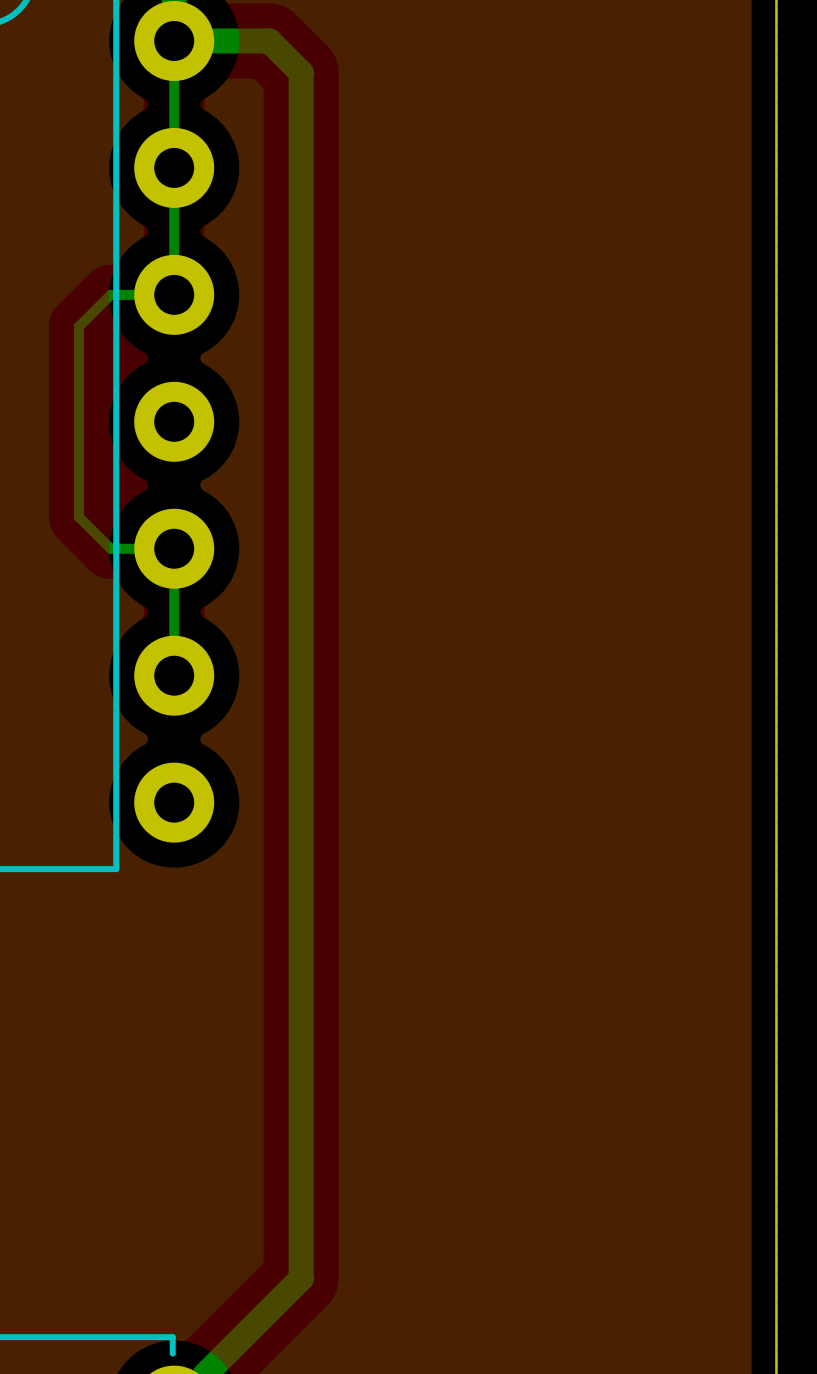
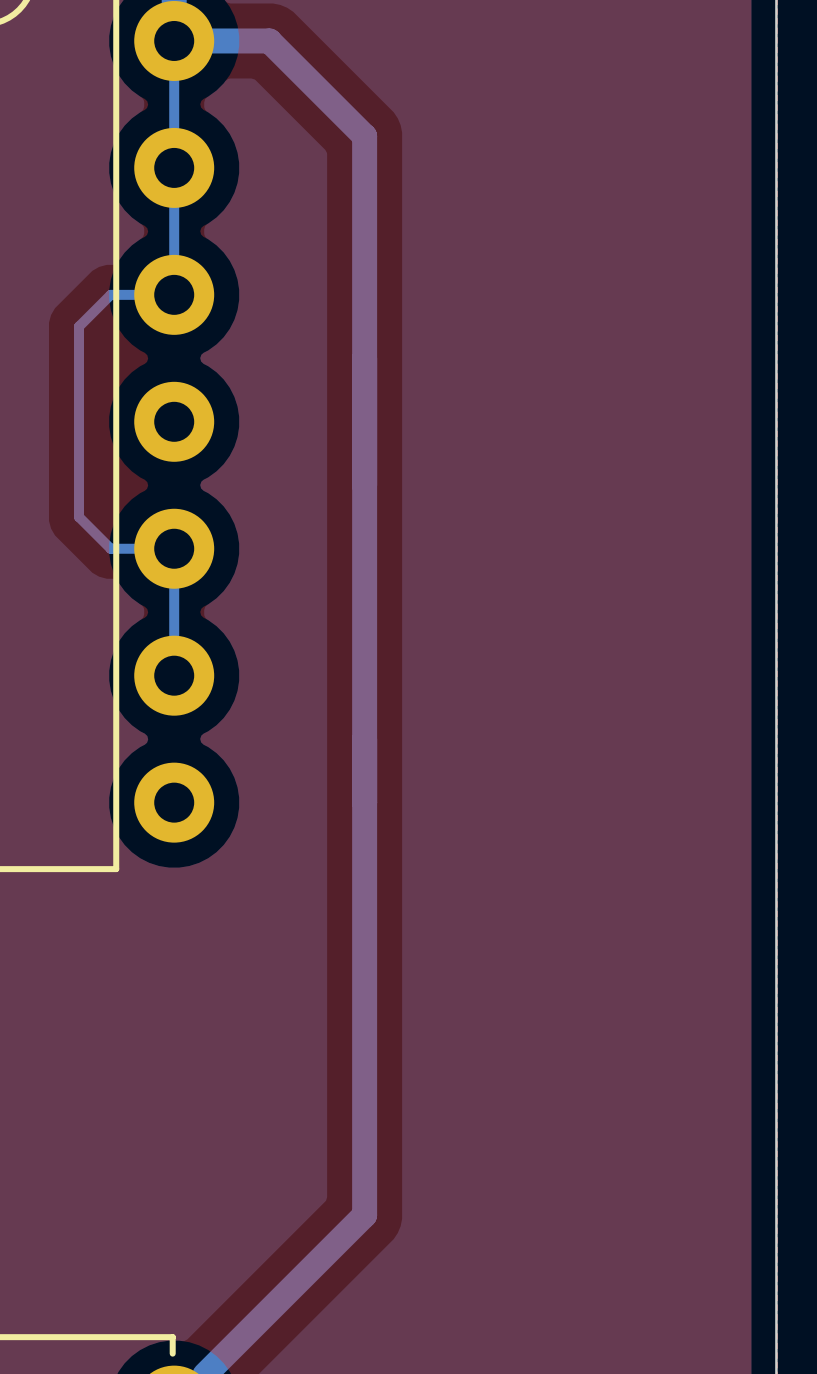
bottom track: (301, 72) (301, 1278) -> (301, 72) (364, 136) (364, 1215) (301, 1278)

